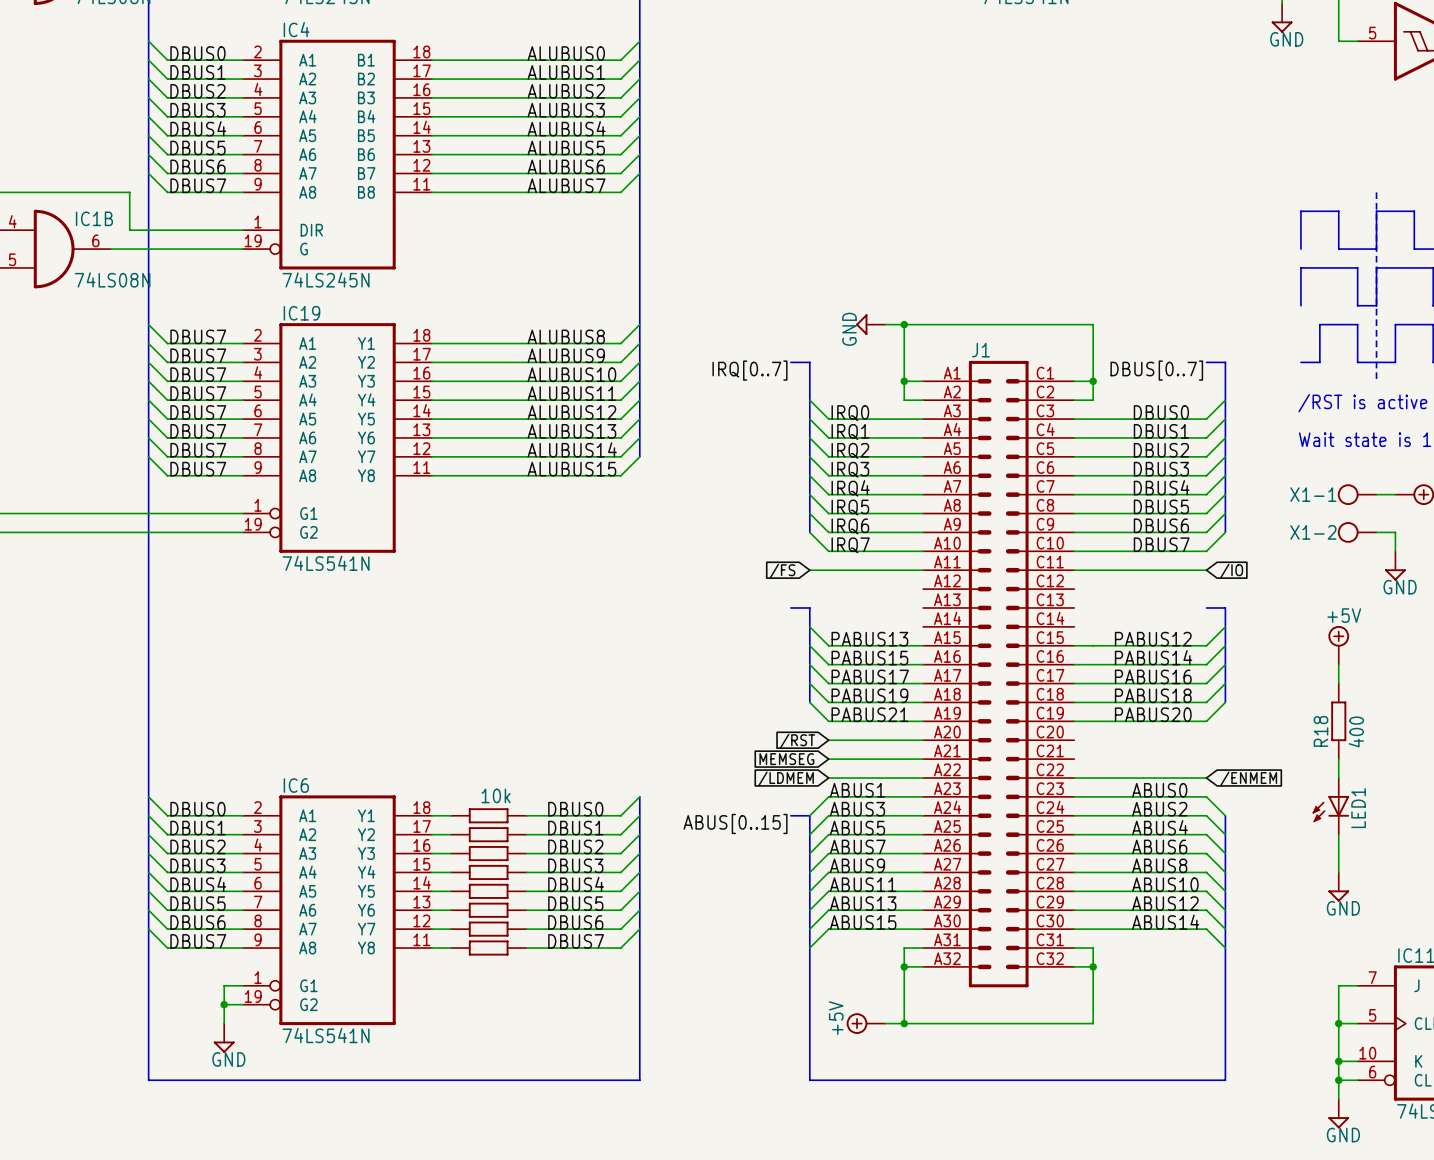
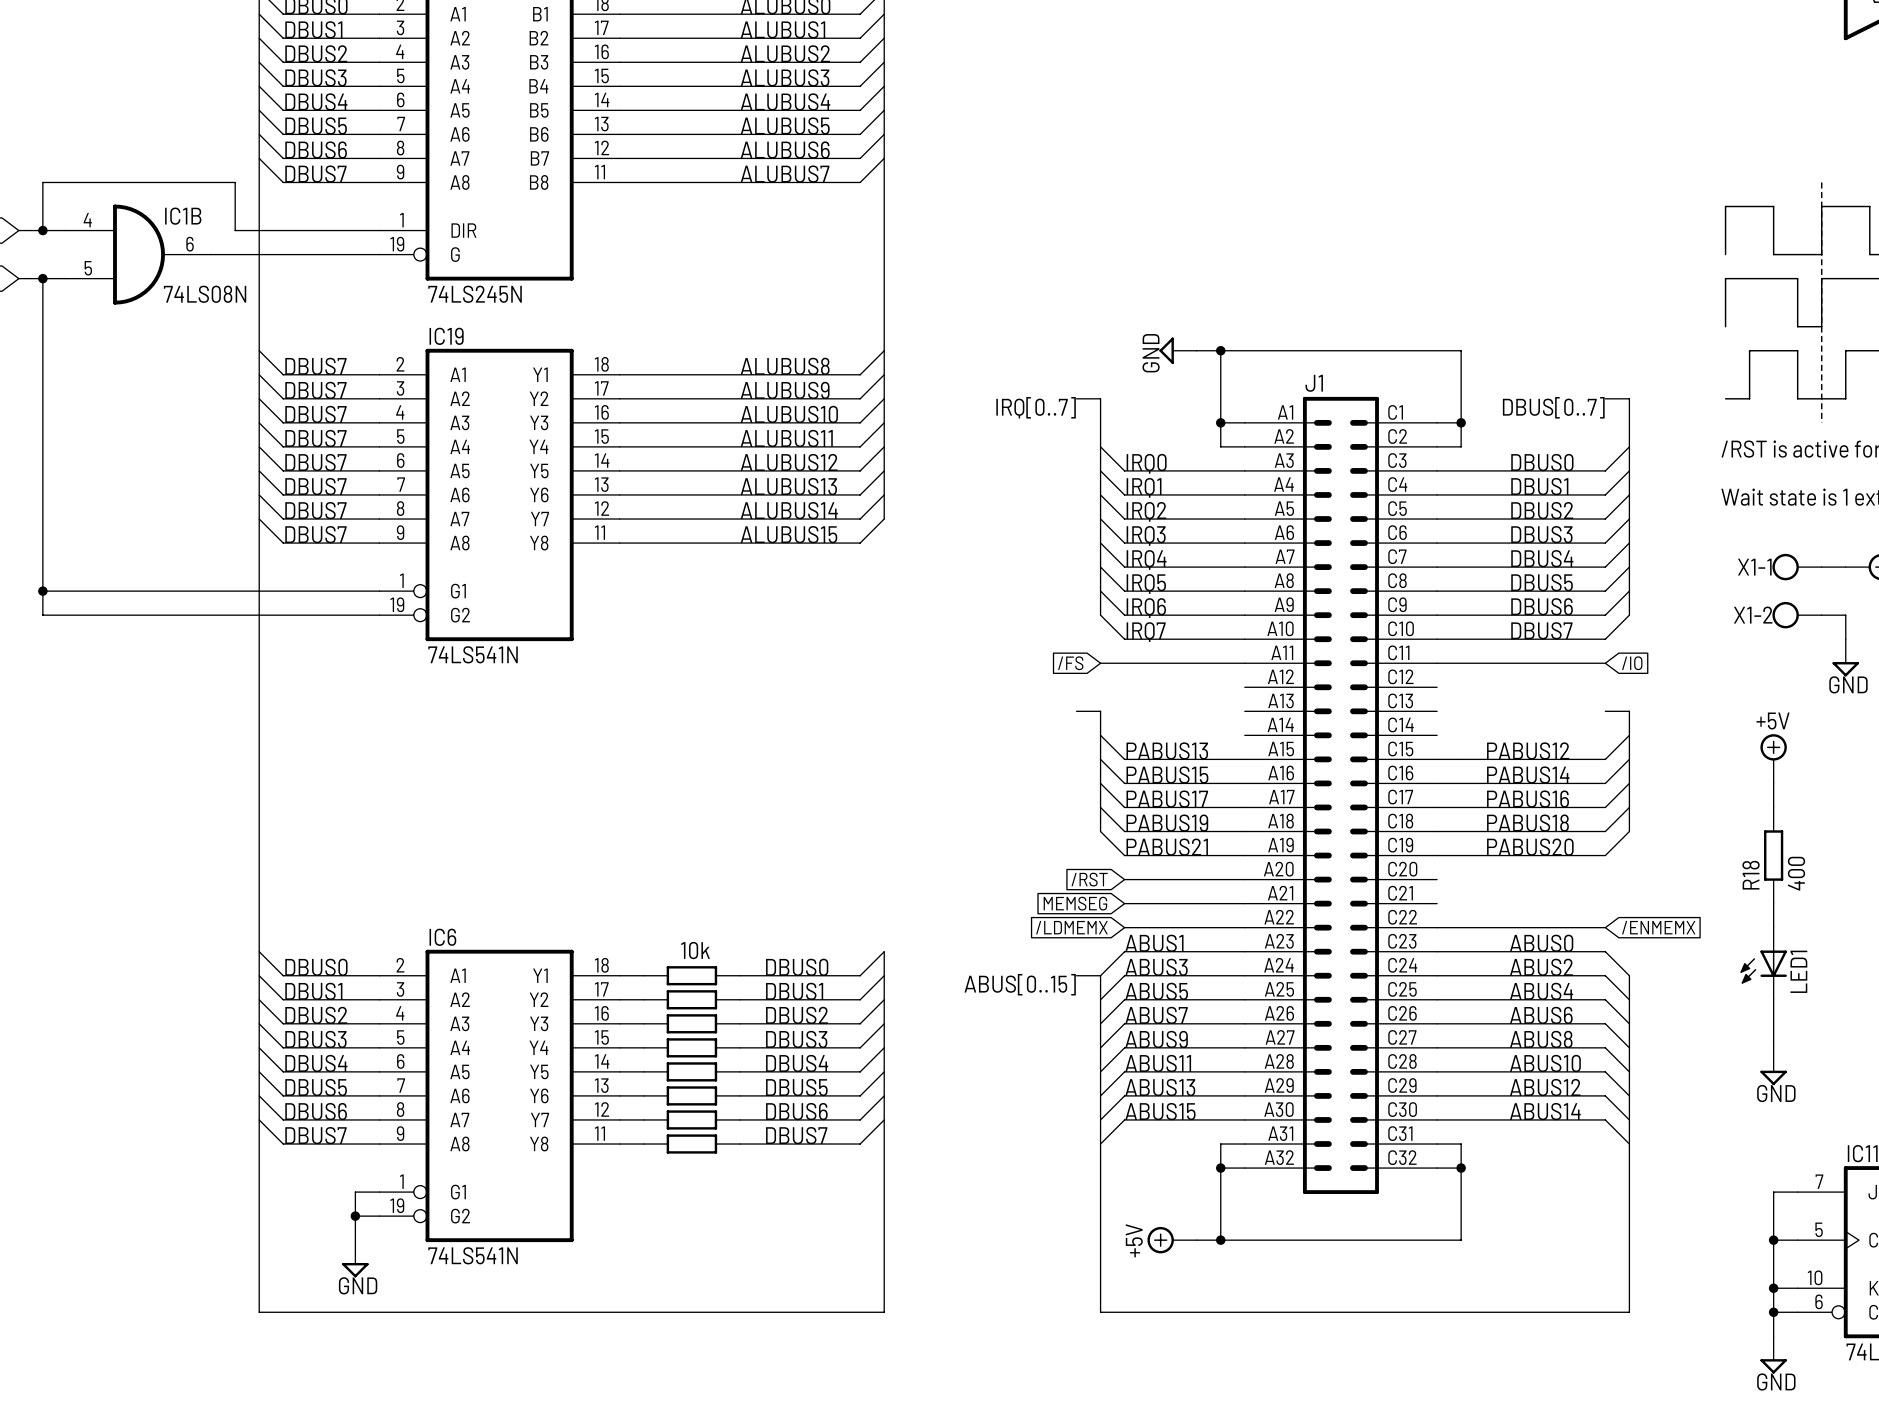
global label: /LDMEM (785, 779) -> /LDMEMX (1071, 927)
global label: /ENMEM (1248, 779) -> /ENMEMX (1658, 927)

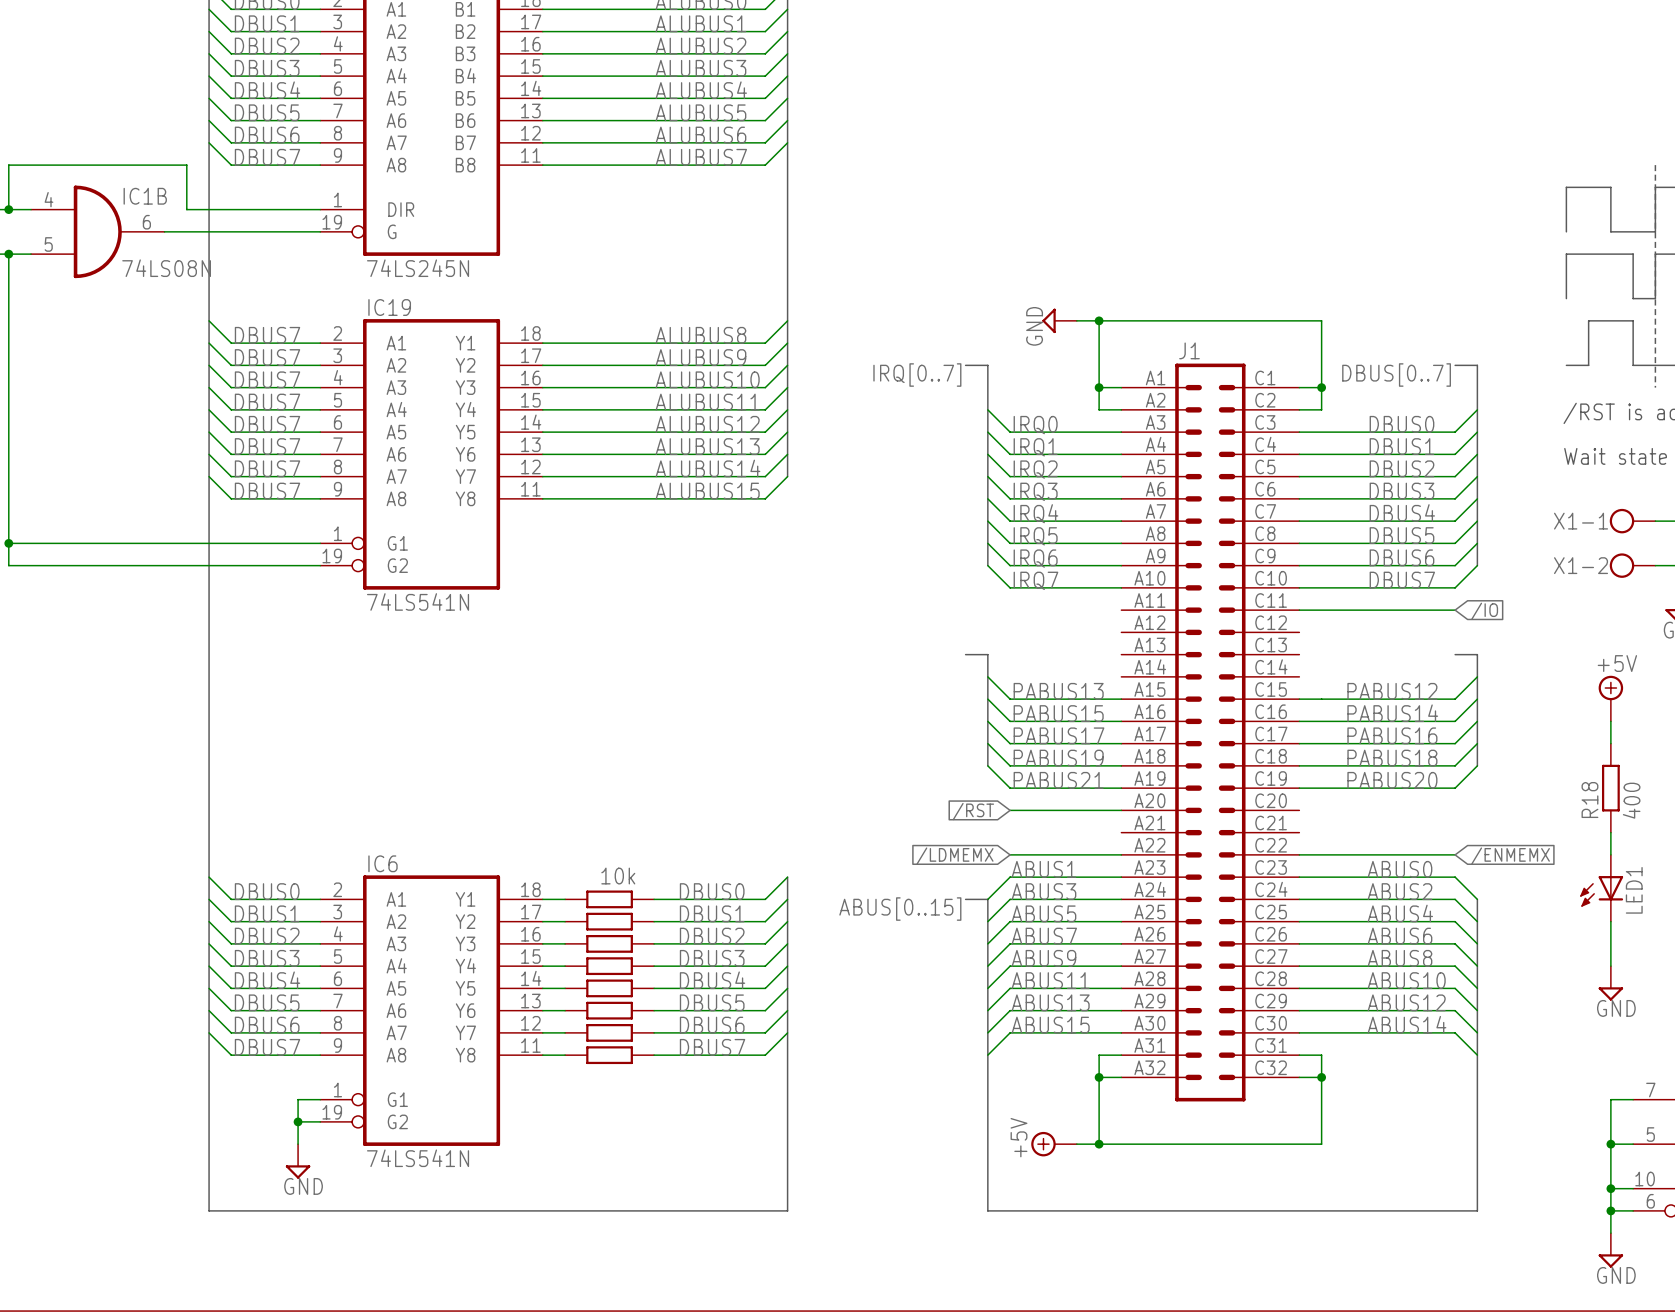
global label: /FS (1070, 663) -> none
wire: (1100, 663) (1244, 663) -> none
global label: MEMSEG (1075, 903) -> none
wire: (1124, 903) (1244, 903) -> none

